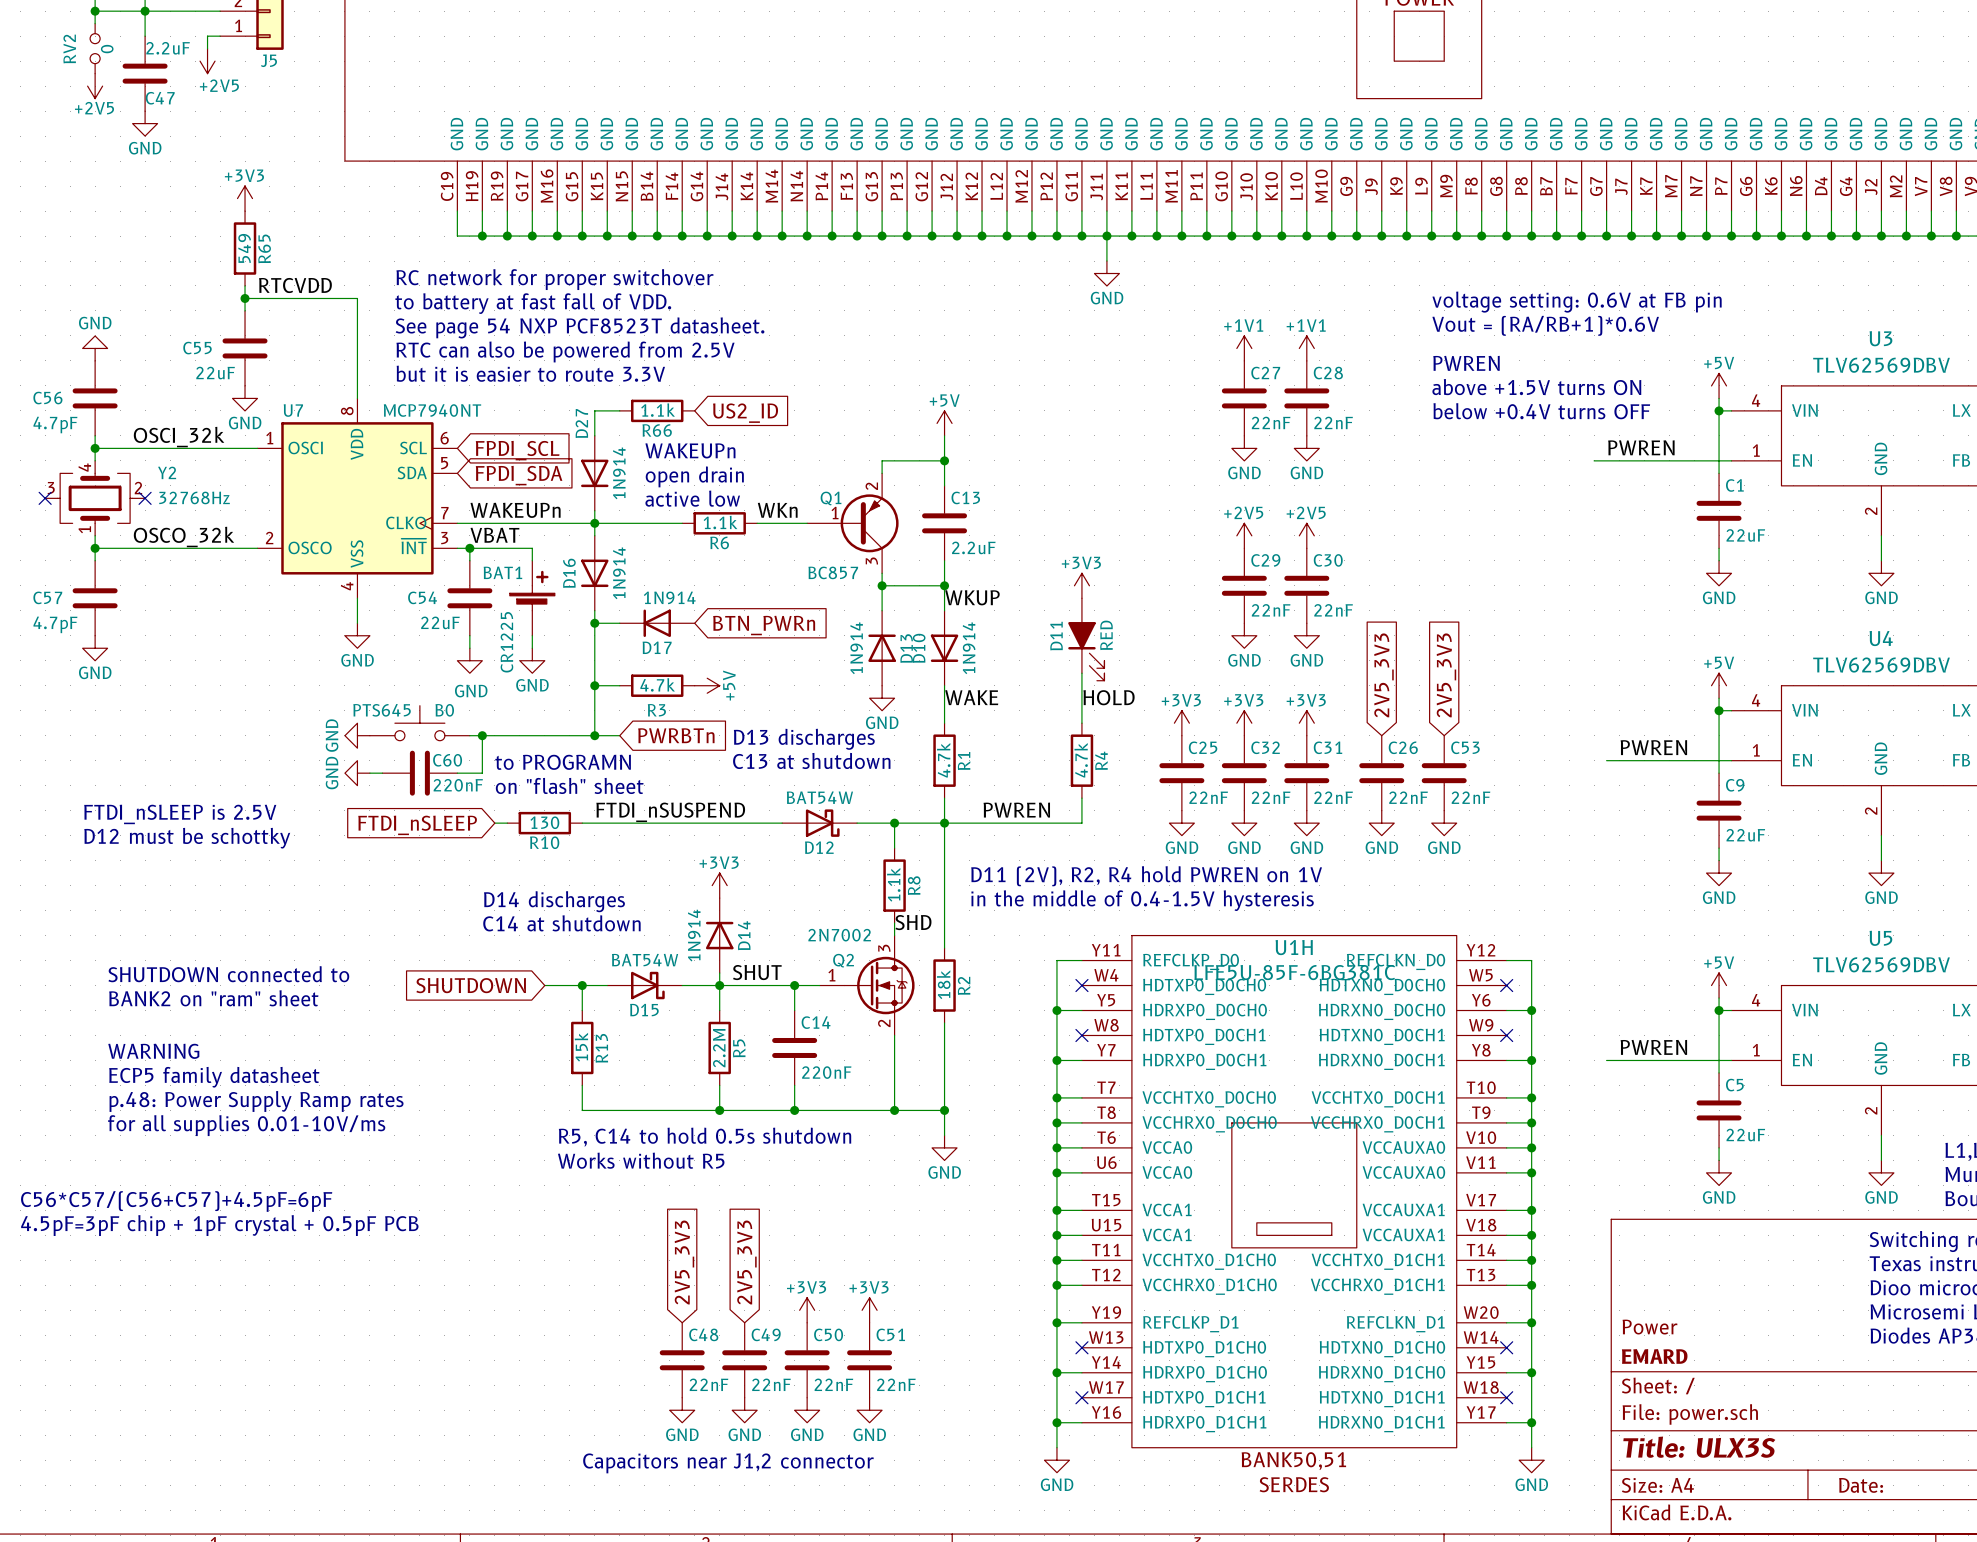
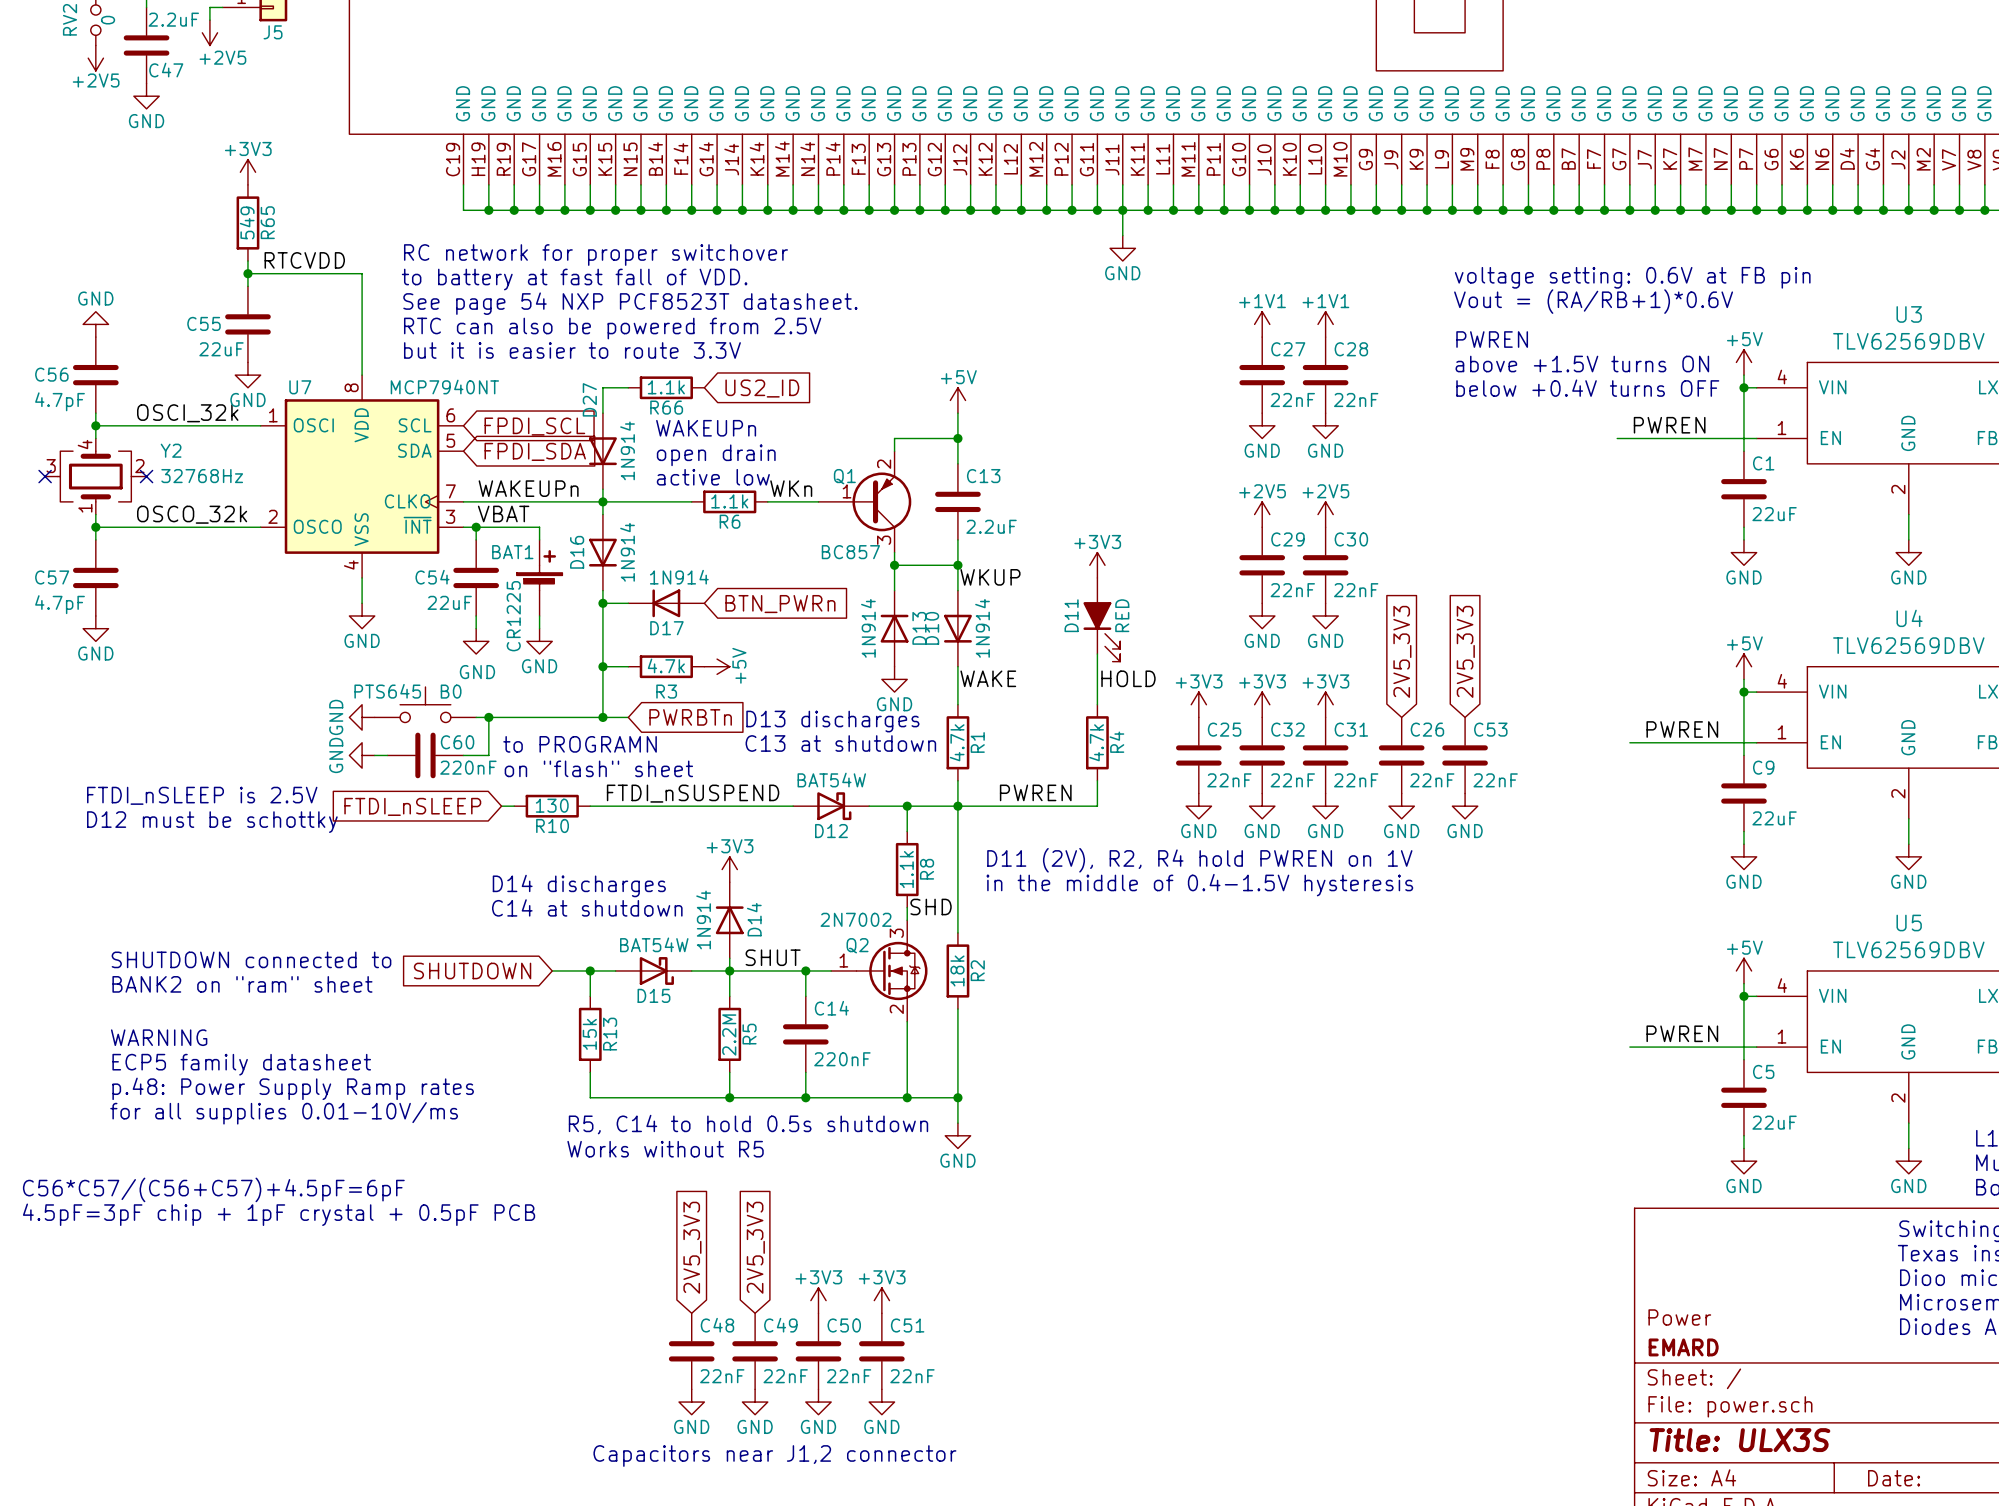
wire: (1081, 960) (1056, 960) (1056, 1447) -> none
wire: (1506, 960) (1531, 960) (1531, 1447) -> none
no-connect mark: (1081, 985) -> none
no-connect mark: (1506, 985) -> none
wire: (1056, 1010) (1081, 1010) -> none
junction: (1056, 1010) -> none
wire: (1506, 1010) (1531, 1010) -> none
junction: (1531, 1010) -> none
no-connect mark: (1081, 1035) -> none
no-connect mark: (1506, 1035) -> none
wire: (1056, 1060) (1081, 1060) -> none
junction: (1056, 1060) -> none
wire: (1506, 1060) (1531, 1060) -> none
junction: (1531, 1060) -> none
wire: (1056, 1097) (1081, 1097) -> none
junction: (1056, 1097) -> none
wire: (1506, 1097) (1531, 1097) -> none
junction: (1531, 1097) -> none
wire: (1056, 1122) (1081, 1122) -> none
junction: (1056, 1122) -> none
wire: (1506, 1122) (1531, 1122) -> none
junction: (1531, 1122) -> none
wire: (1056, 1147) (1081, 1147) -> none
junction: (1056, 1147) -> none
wire: (1506, 1147) (1531, 1147) -> none
junction: (1531, 1147) -> none
wire: (1056, 1172) (1081, 1172) -> none
junction: (1056, 1172) -> none
wire: (1506, 1172) (1531, 1172) -> none
junction: (1531, 1172) -> none
U1H: LFE5U-85F-6BG381C (1294, 1191) -> none
wire: (1056, 1210) (1081, 1210) -> none
junction: (1056, 1210) -> none
wire: (1506, 1210) (1531, 1210) -> none
junction: (1531, 1210) -> none
wire: (1056, 1235) (1081, 1235) -> none
junction: (1056, 1235) -> none
wire: (1506, 1235) (1531, 1235) -> none
junction: (1531, 1235) -> none
wire: (1056, 1260) (1081, 1260) -> none
junction: (1056, 1260) -> none
wire: (1506, 1260) (1531, 1260) -> none
junction: (1531, 1260) -> none
wire: (1056, 1285) (1081, 1285) -> none
junction: (1056, 1285) -> none
wire: (1506, 1285) (1531, 1285) -> none
junction: (1531, 1285) -> none
wire: (1056, 1322) (1081, 1322) -> none
junction: (1056, 1322) -> none
wire: (1506, 1322) (1531, 1322) -> none
junction: (1531, 1322) -> none
no-connect mark: (1081, 1347) -> none
no-connect mark: (1506, 1347) -> none
wire: (1056, 1372) (1081, 1372) -> none
junction: (1056, 1372) -> none
wire: (1506, 1372) (1531, 1372) -> none
junction: (1531, 1372) -> none
no-connect mark: (1081, 1397) -> none
no-connect mark: (1506, 1397) -> none
wire: (1056, 1422) (1081, 1422) -> none
junction: (1056, 1422) -> none
wire: (1506, 1422) (1531, 1422) -> none
junction: (1531, 1422) -> none
power symbol: GND (1056, 1460) -> none
power symbol: GND (1531, 1460) -> none

